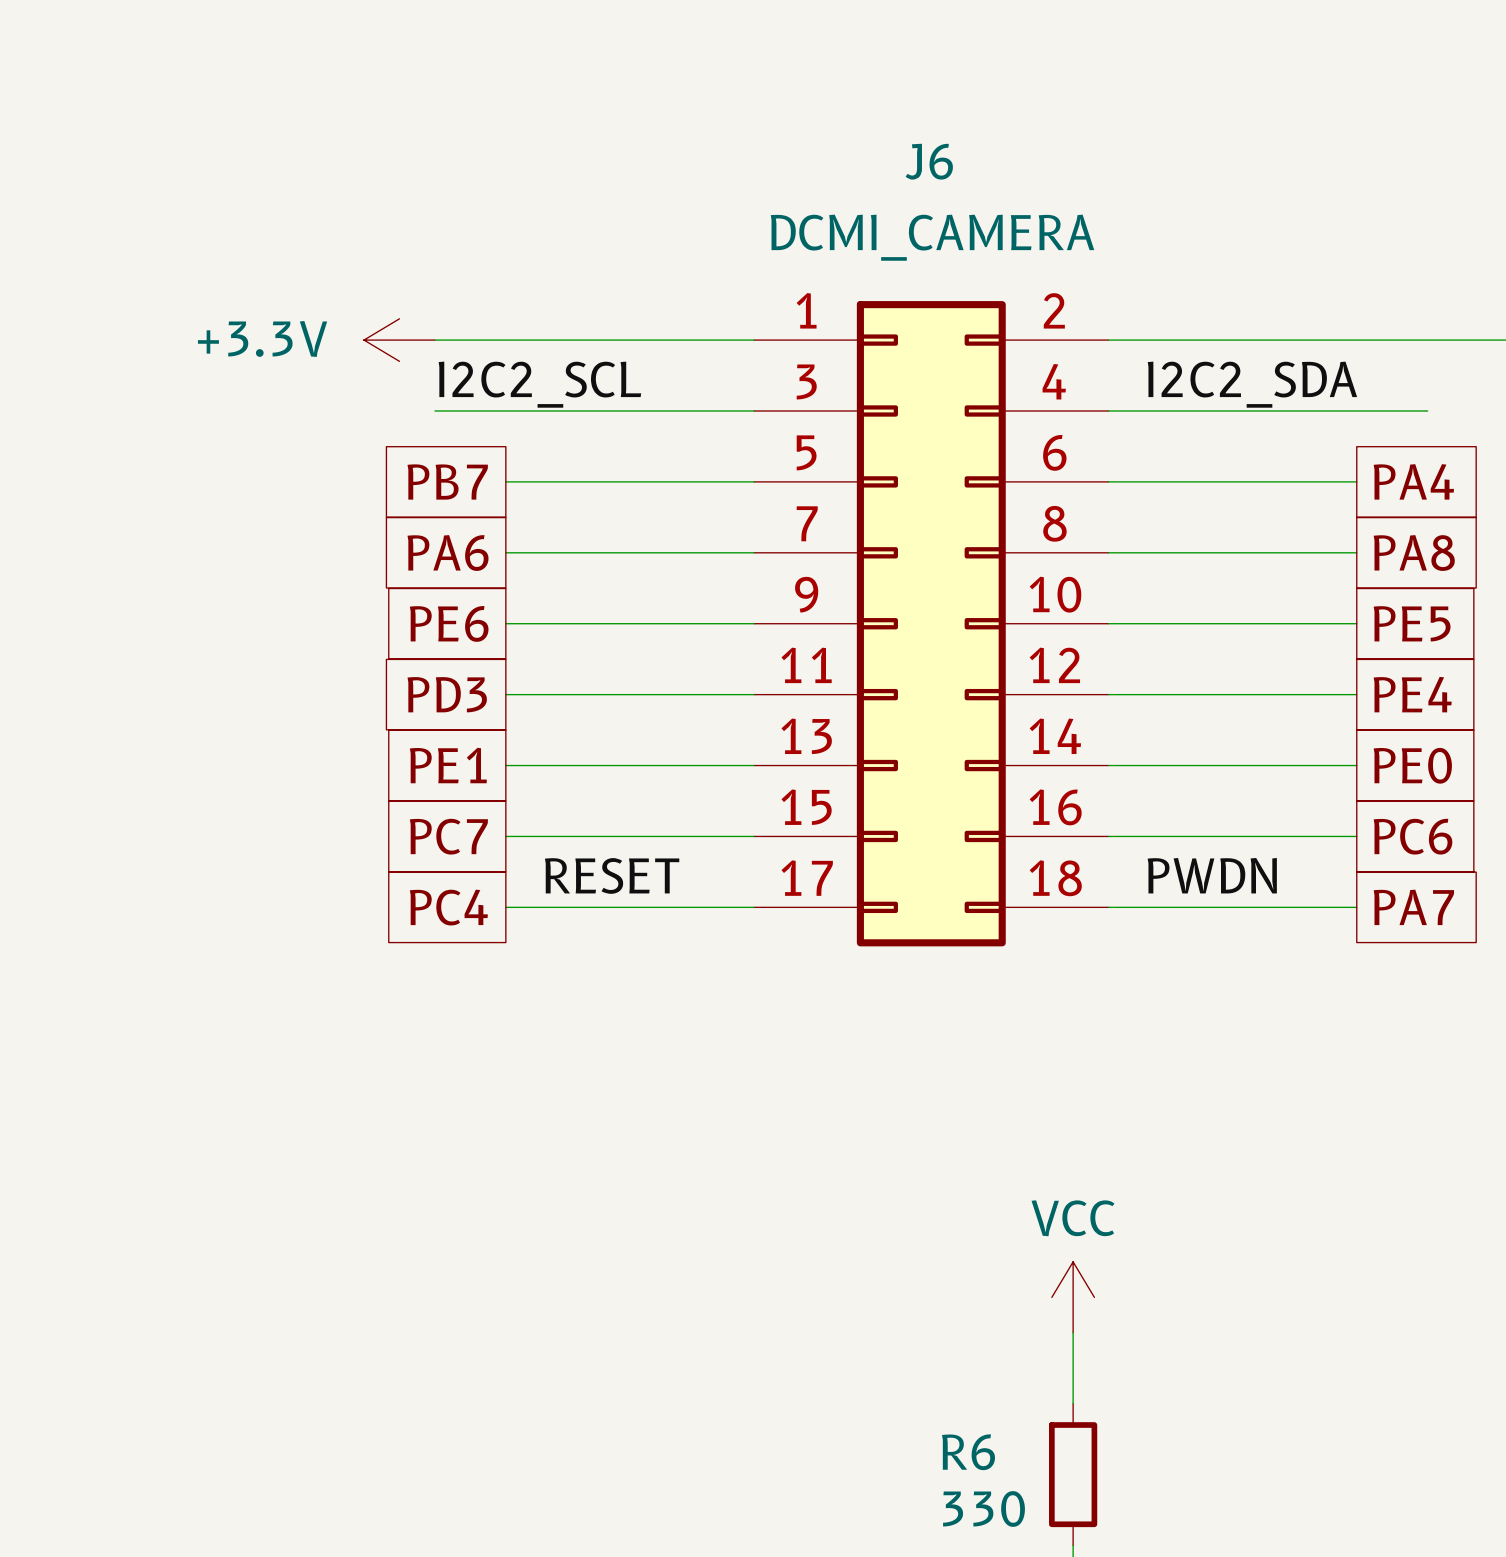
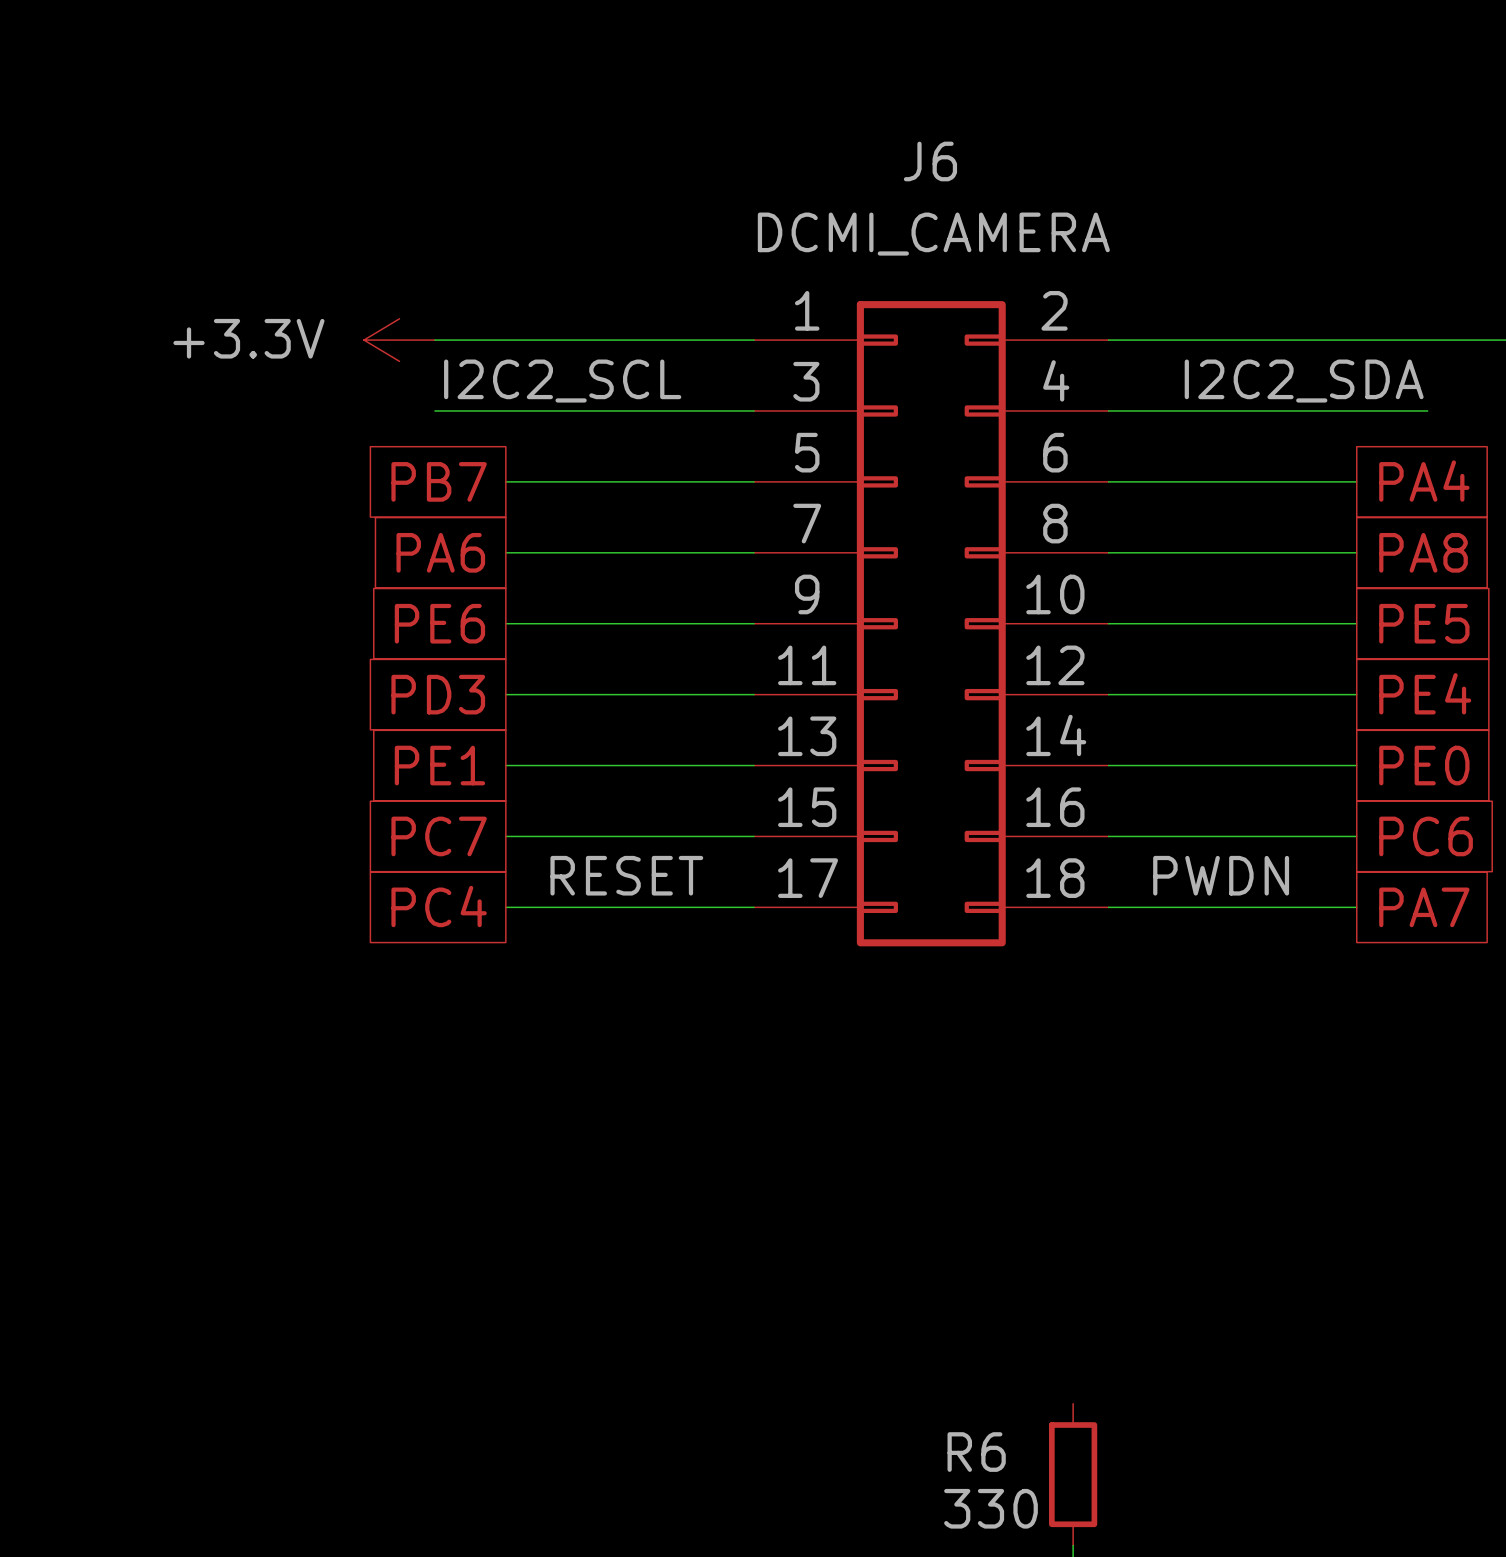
label position: I2C2_SDA (1252, 384) -> I2C2_SDA (1304, 381)
power symbol: VCC (1073, 1297) -> none
wire: (1073, 1332) (1073, 1403) -> none

